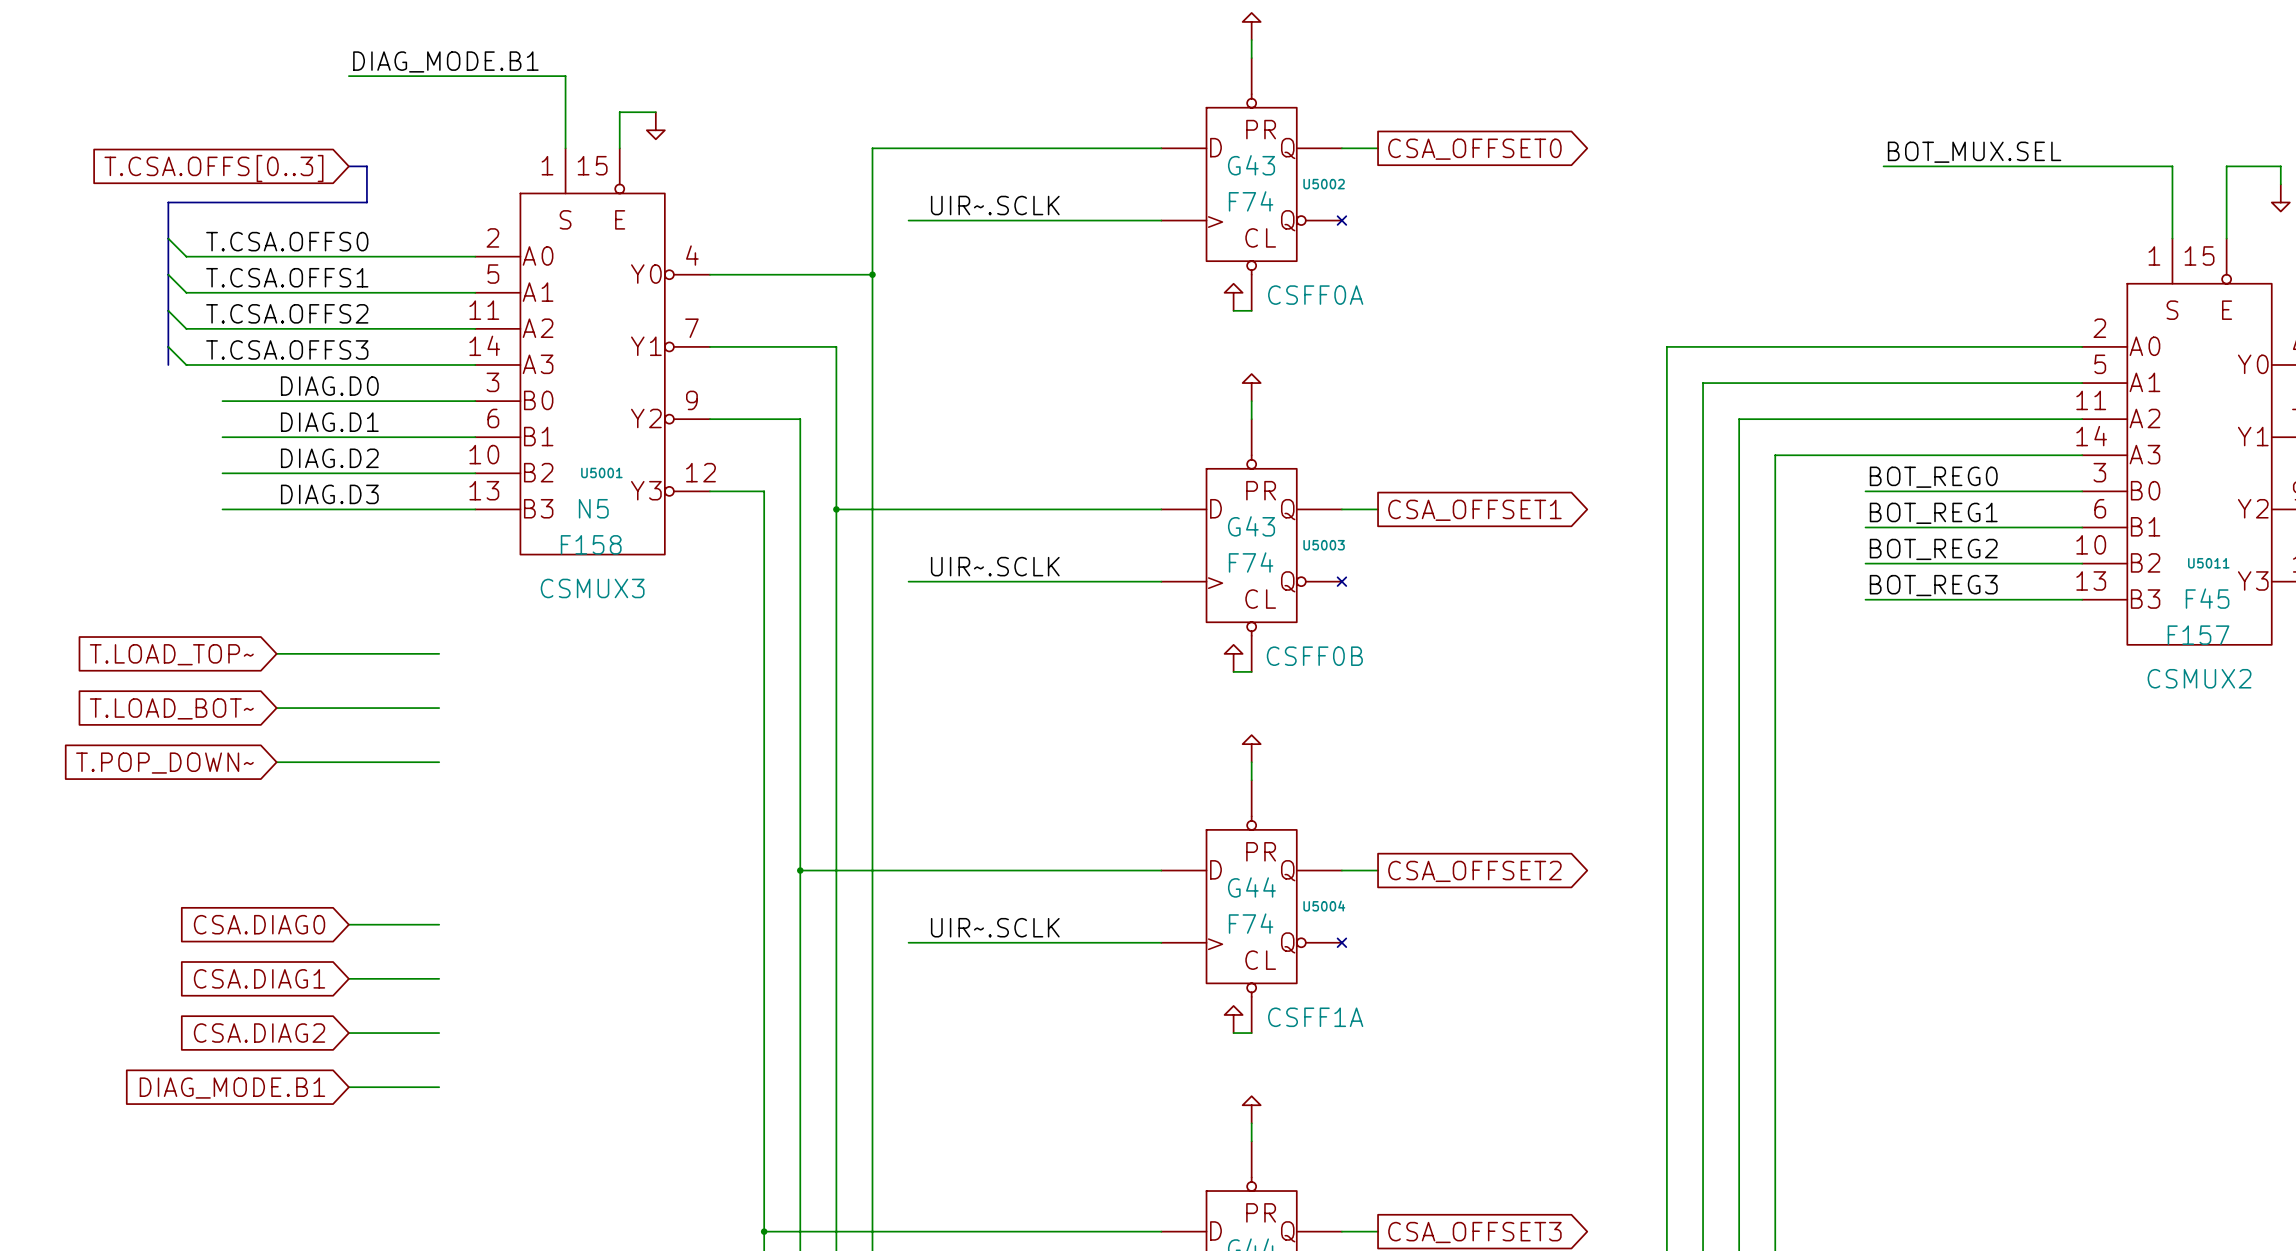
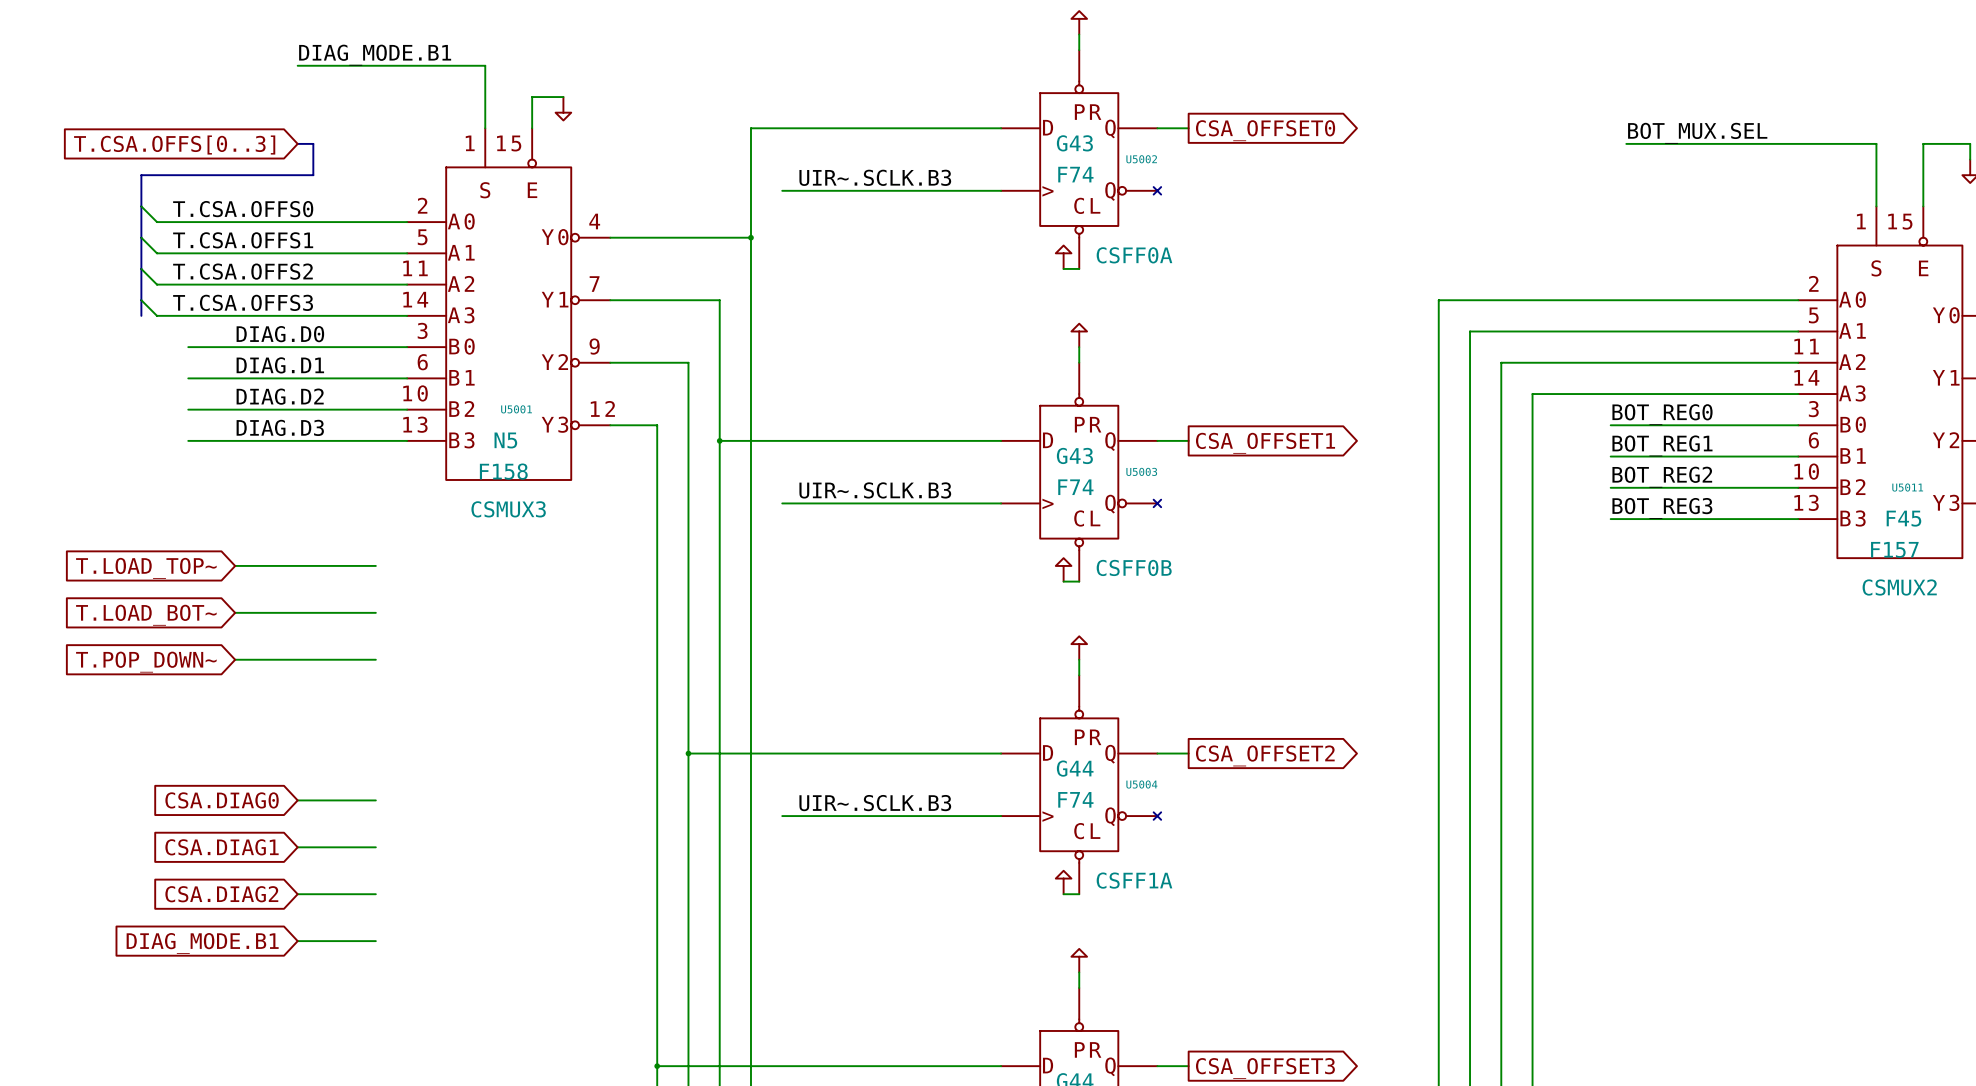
label: UIR~.SCLK (995, 205) -> UIR~.SCLK.B3 (875, 177)
label: UIR~.SCLK (995, 566) -> UIR~.SCLK.B3 (875, 490)
label: UIR~.SCLK (995, 927) -> UIR~.SCLK.B3 (875, 803)

